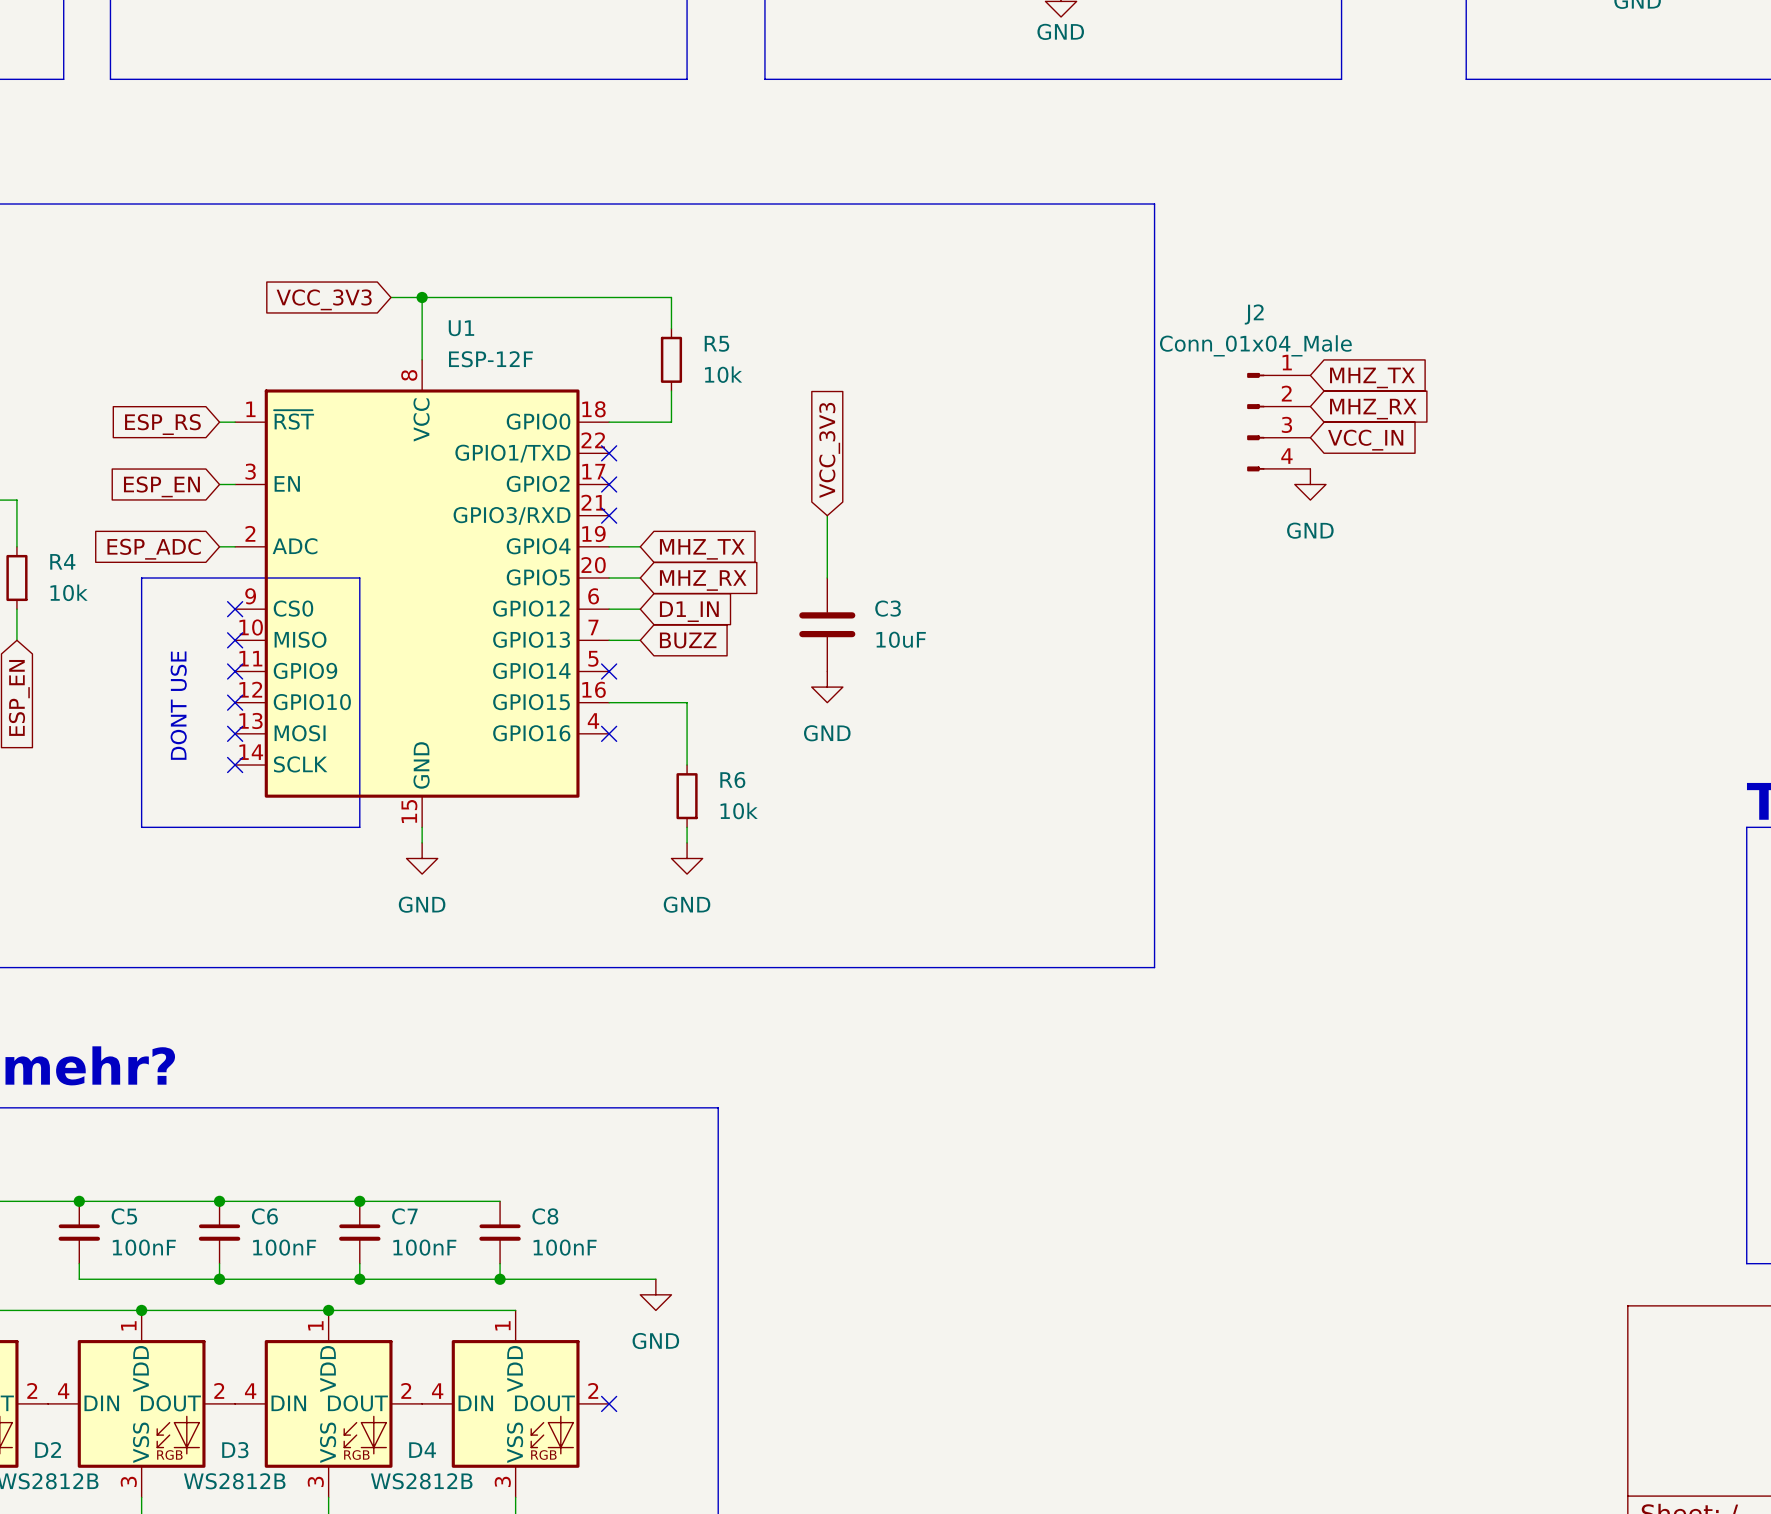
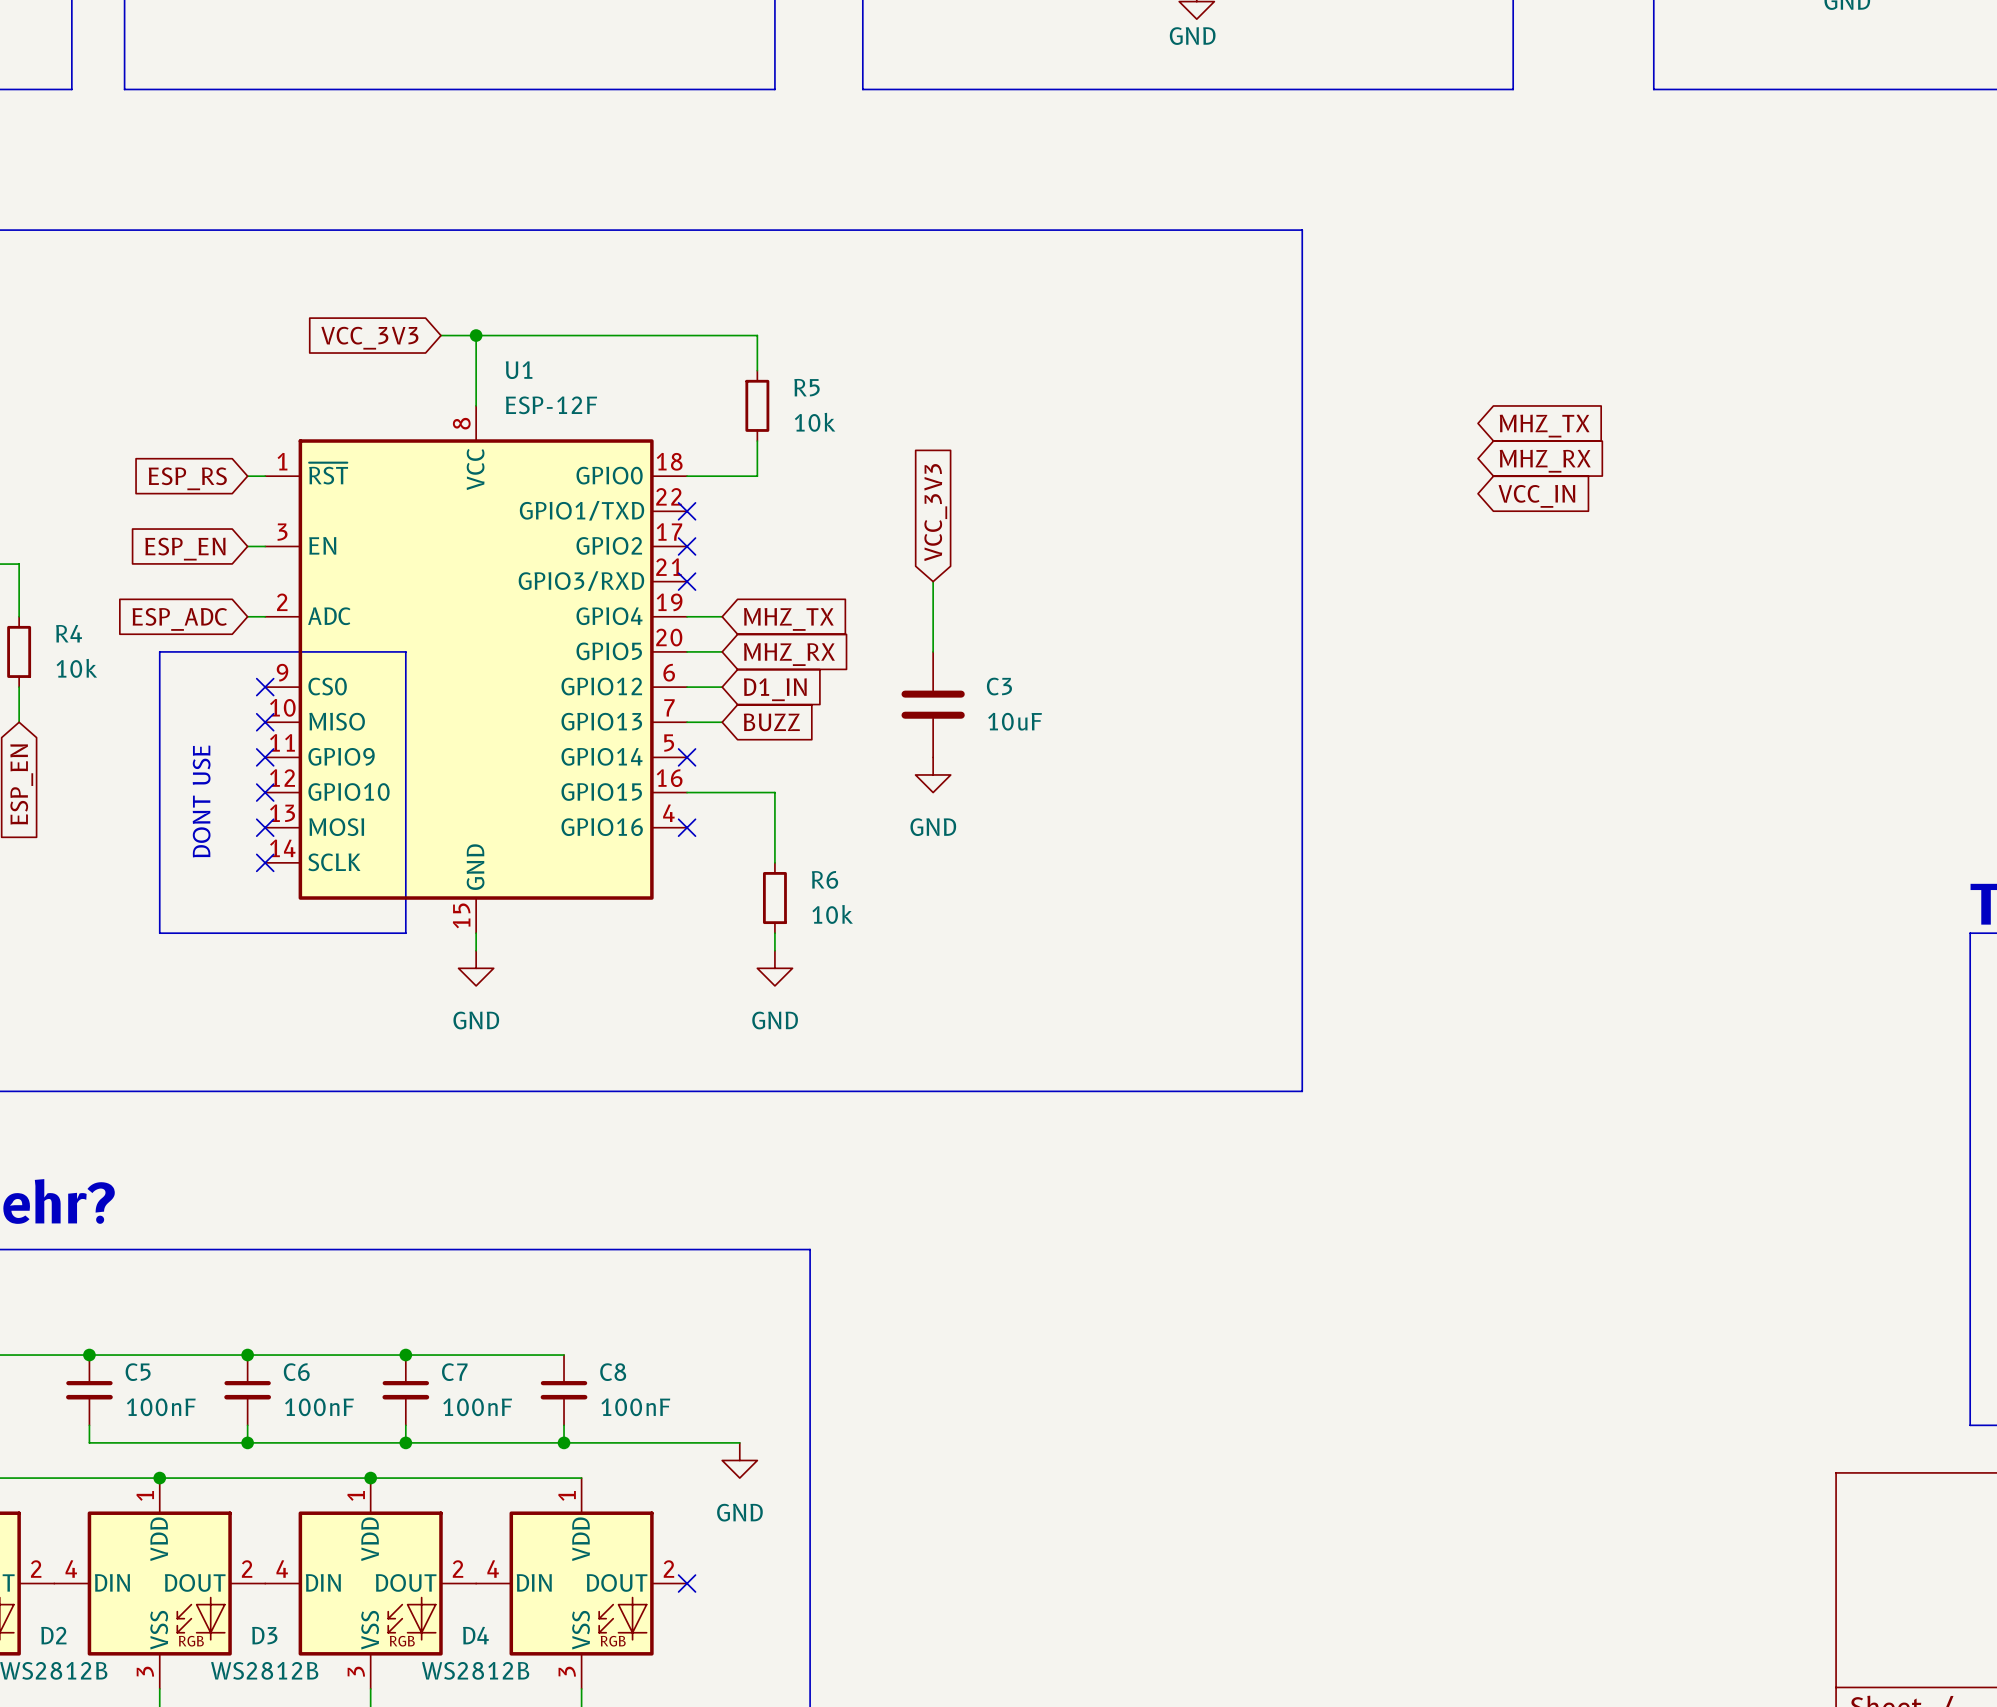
J2: Conn_01x04_Male (1278, 422) -> none
power symbol: GND (1310, 484) -> none

